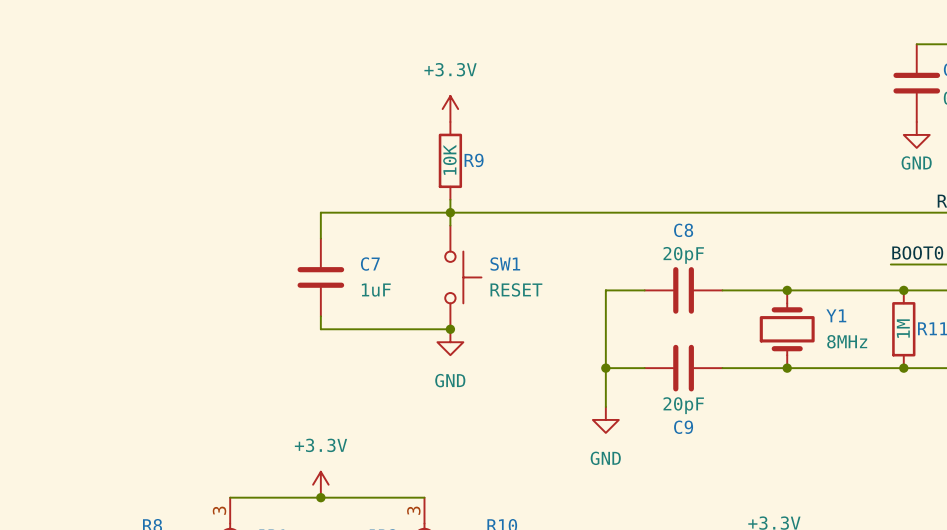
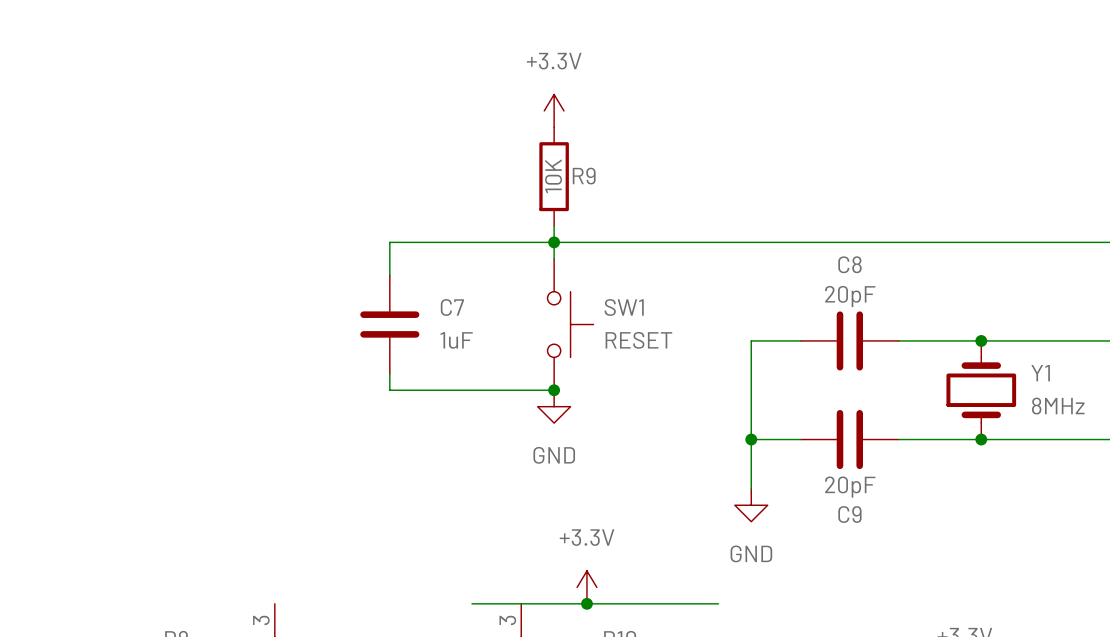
power symbol position: +3.3V (320, 484) -> +3.3V (586, 587)
wire: (230, 497) (385, 497) -> (521, 603) (718, 603)
junction: (320, 497) -> none
junction: none -> (586, 603)

